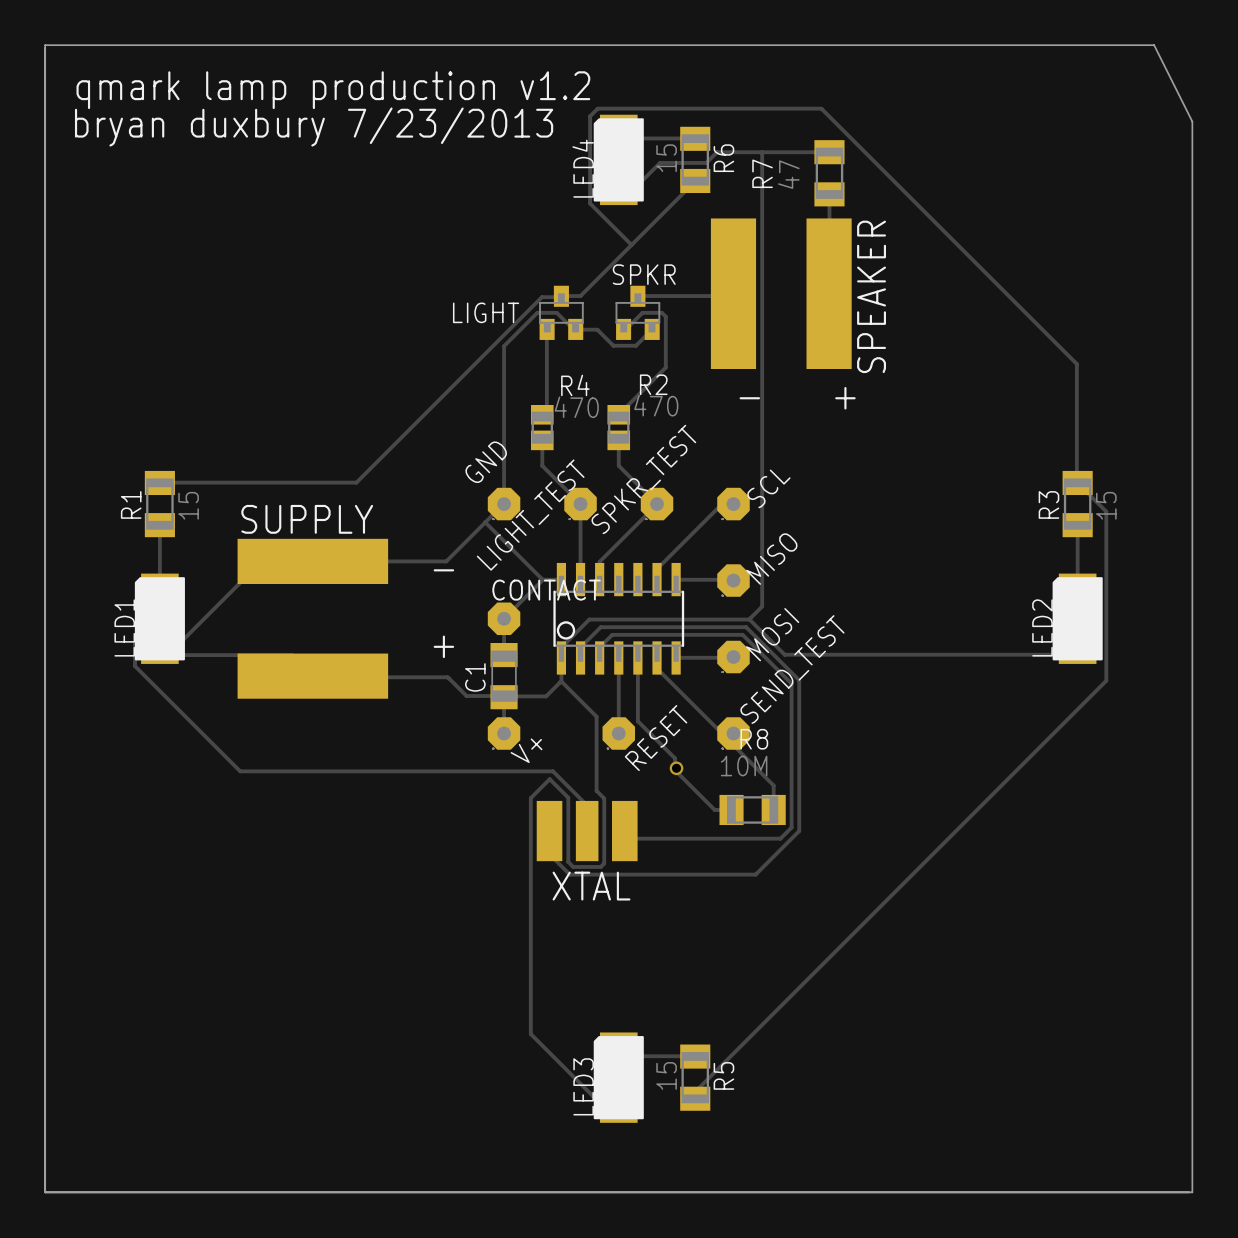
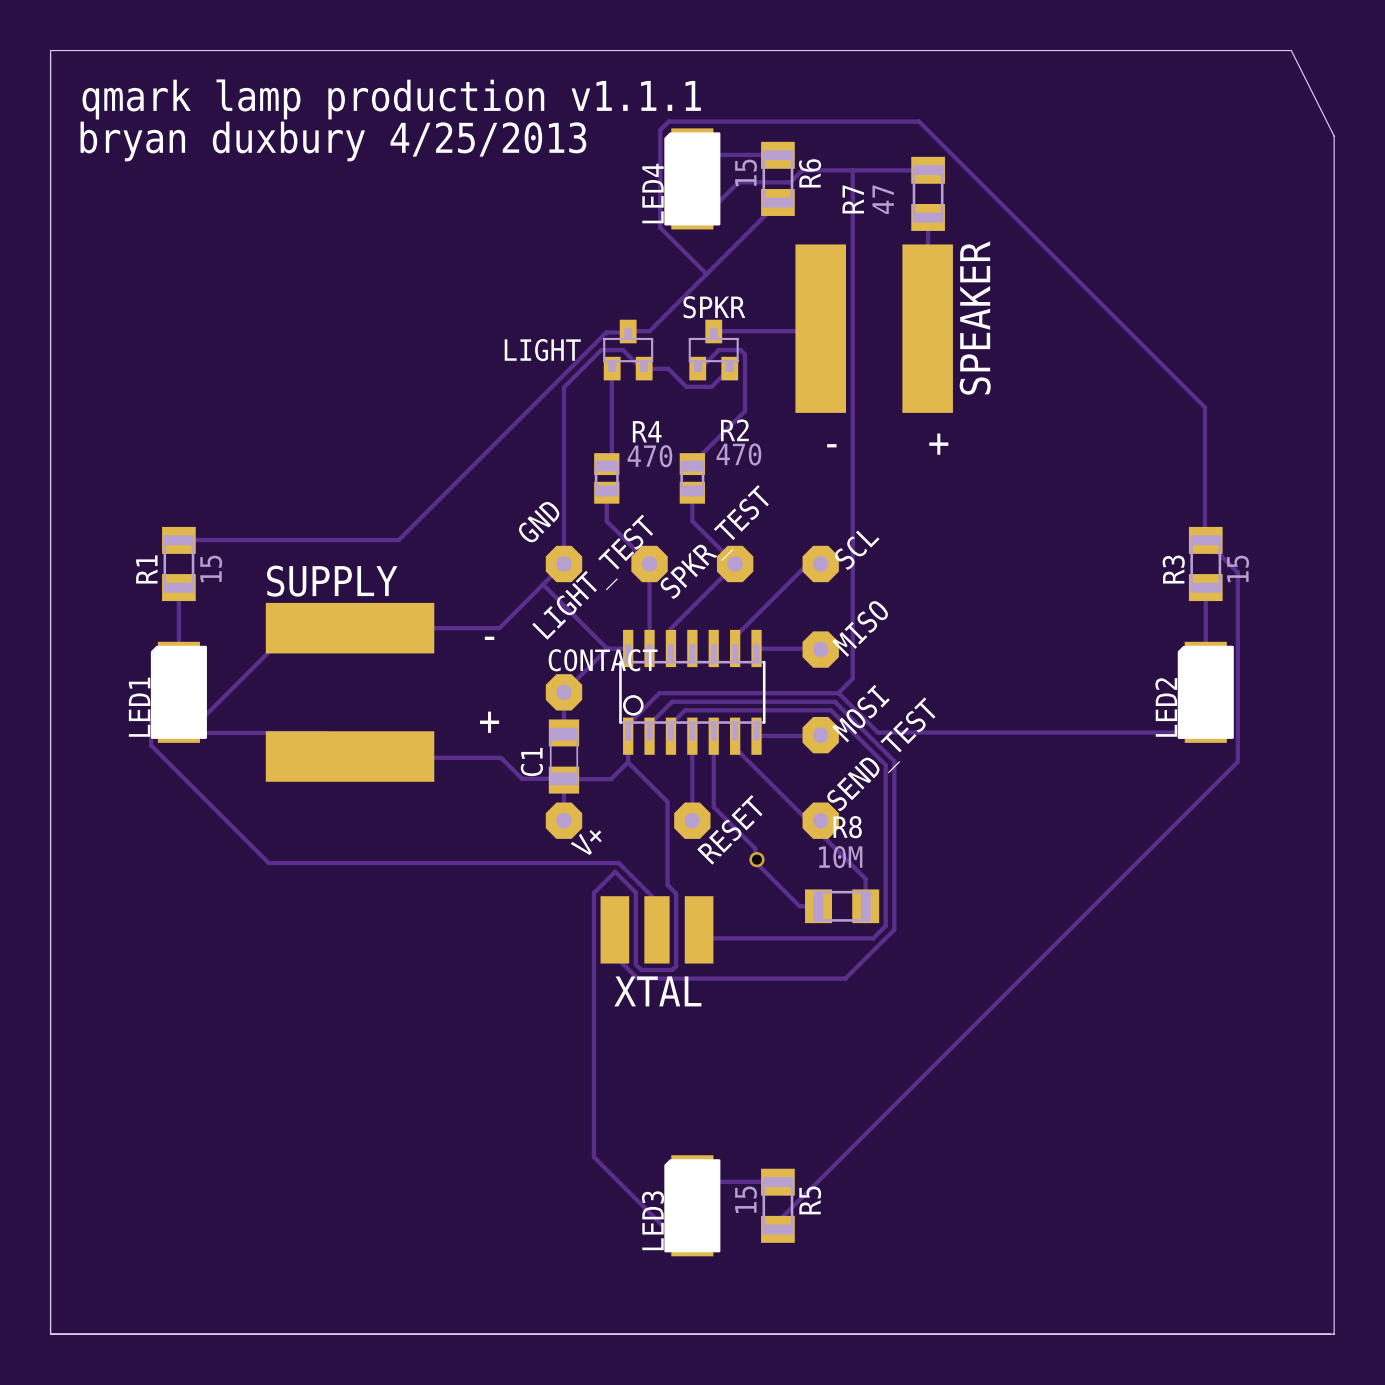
text: qmark lamp production v1.2 (333, 90) -> qmark lamp production v1.1.1 (391, 99)
text: bryan duxbury 7/23/2013 (314, 127) -> bryan duxbury 4/25/2013 (333, 141)

